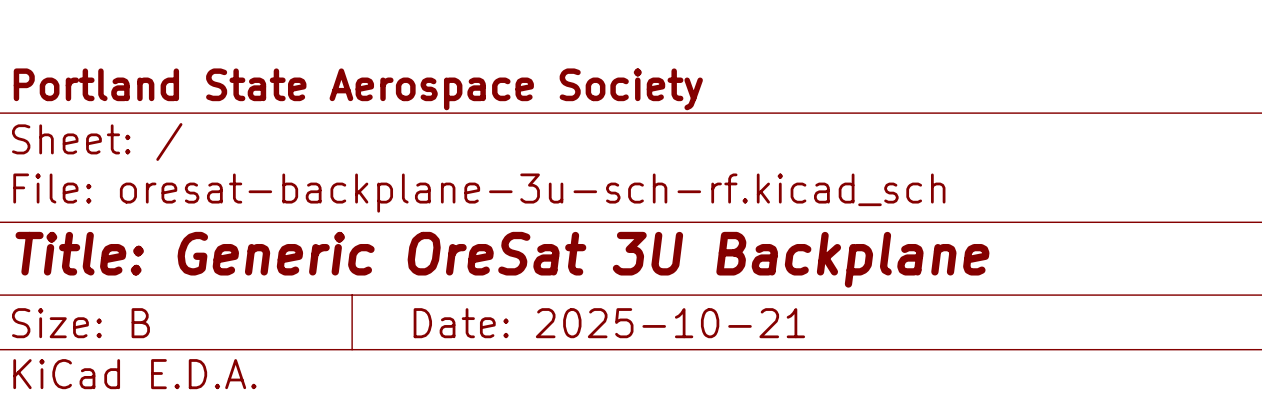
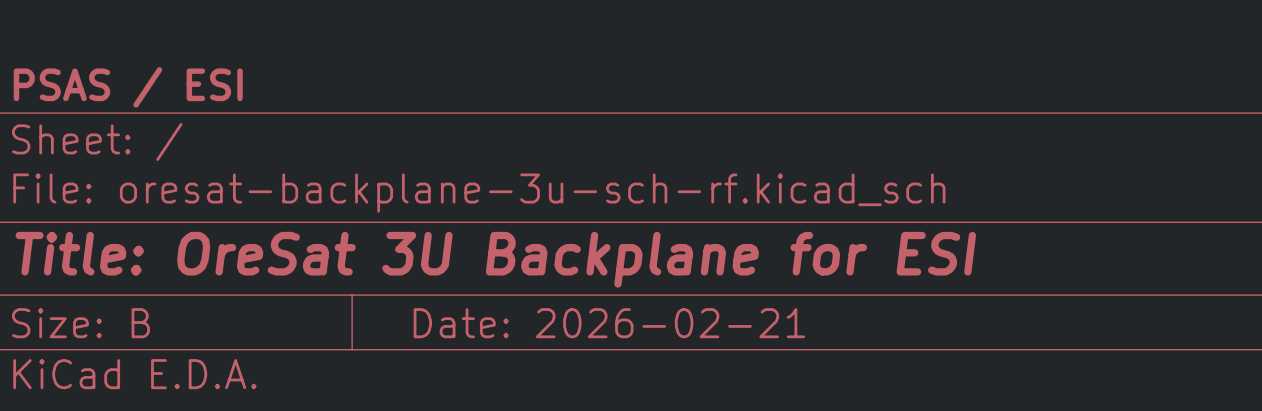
title block: Portland State Aerospace Society (358, 89) -> PSAS / ESI (128, 87)
title block: Title: Generic OreSat 3U Backplane (502, 259) -> Title: OreSat 3U Backplane for ESI (495, 259)
title block: Date: 2025-10-21 (609, 323) -> Date: 2026-02-21 (609, 323)

